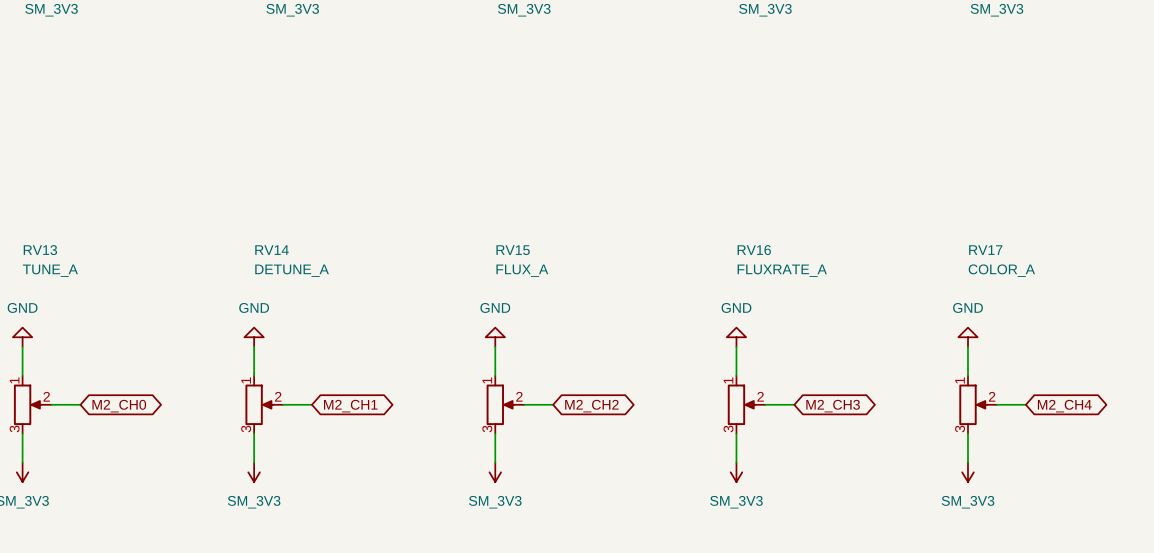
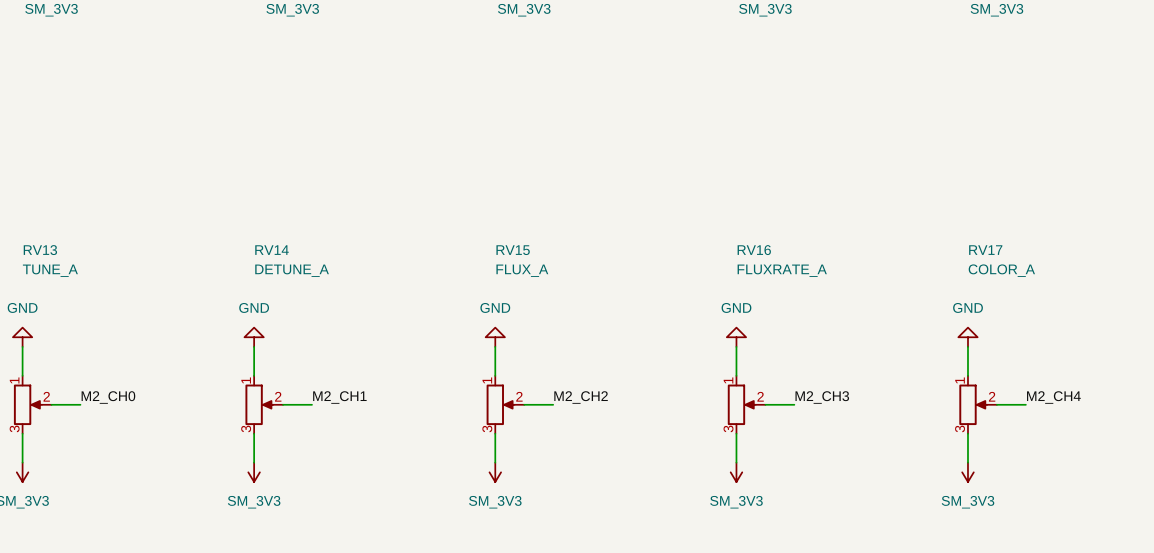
label: none -> M2_CH0 (108, 397)
label: none -> M2_CH1 (339, 397)
label: none -> M2_CH2 (581, 397)
label: none -> M2_CH3 (822, 397)
label: none -> M2_CH4 (1053, 397)
global label: M2_CH0 (119, 406) -> none
global label: M2_CH1 (350, 406) -> none
global label: M2_CH2 (591, 406) -> none
global label: M2_CH3 (833, 406) -> none
global label: M2_CH4 (1064, 406) -> none

